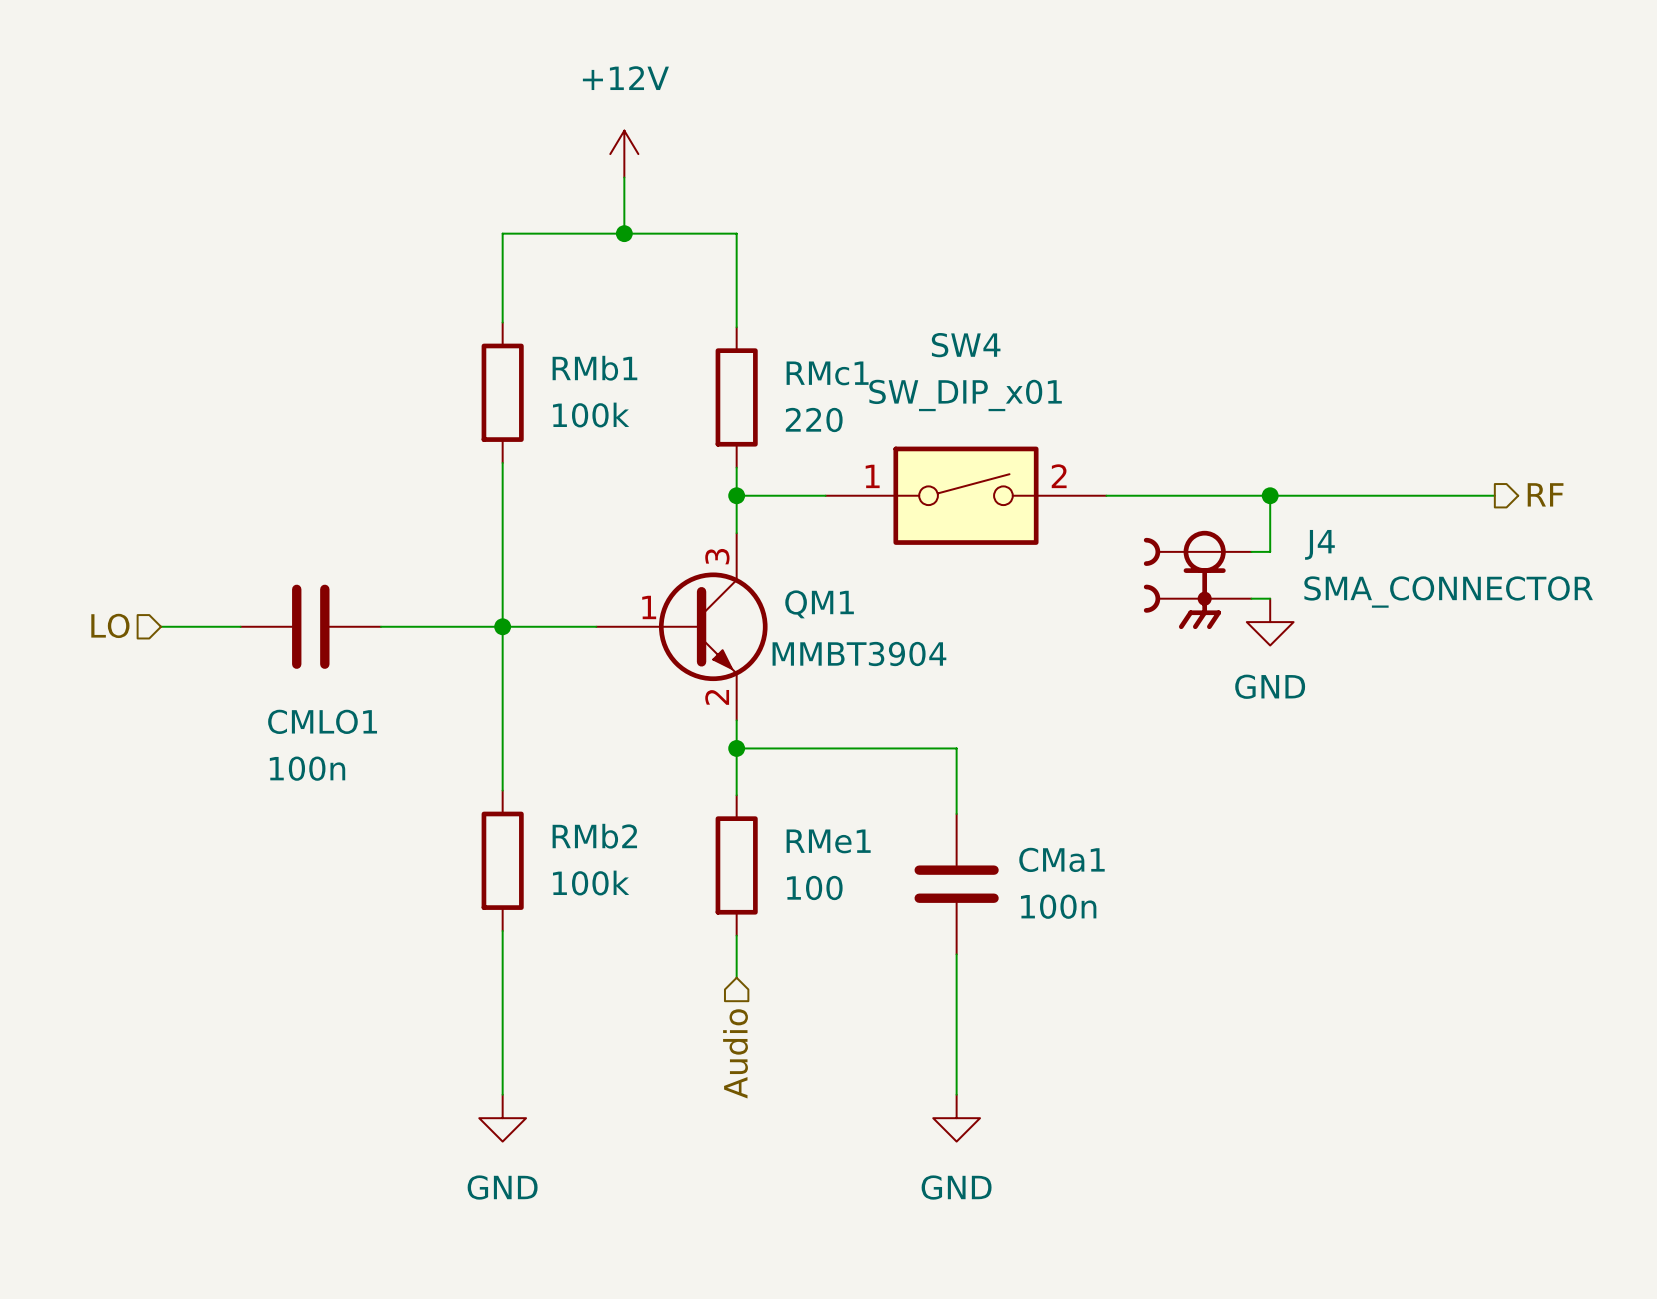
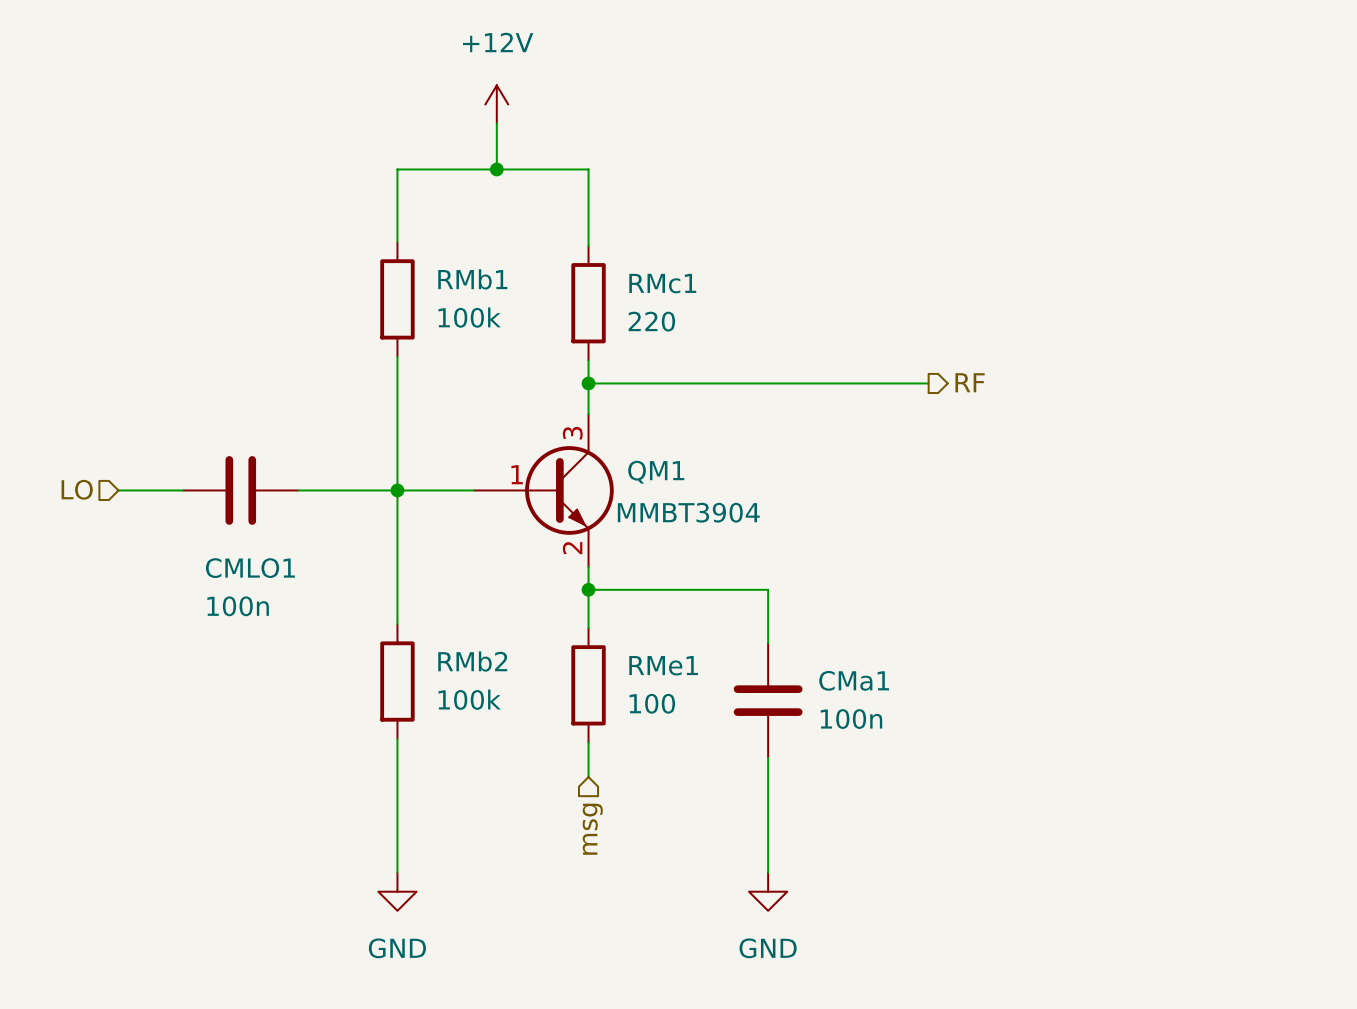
hierarchical label position: RF (1545, 494) -> RF (970, 382)
SW4: SW_DIP_x01 (965, 495) -> none
wire: (1153, 495) (1494, 495) -> none
wire: (1270, 495) (1270, 551) (1251, 551) -> none
junction: (1270, 495) -> none
J4: SMA_CONNECTOR (1197, 579) -> none
wire: (1251, 598) (1270, 598) -> none
power symbol: GND (1270, 622) -> none
hierarchical label: Audio (735, 1053) -> msg (592, 829)

